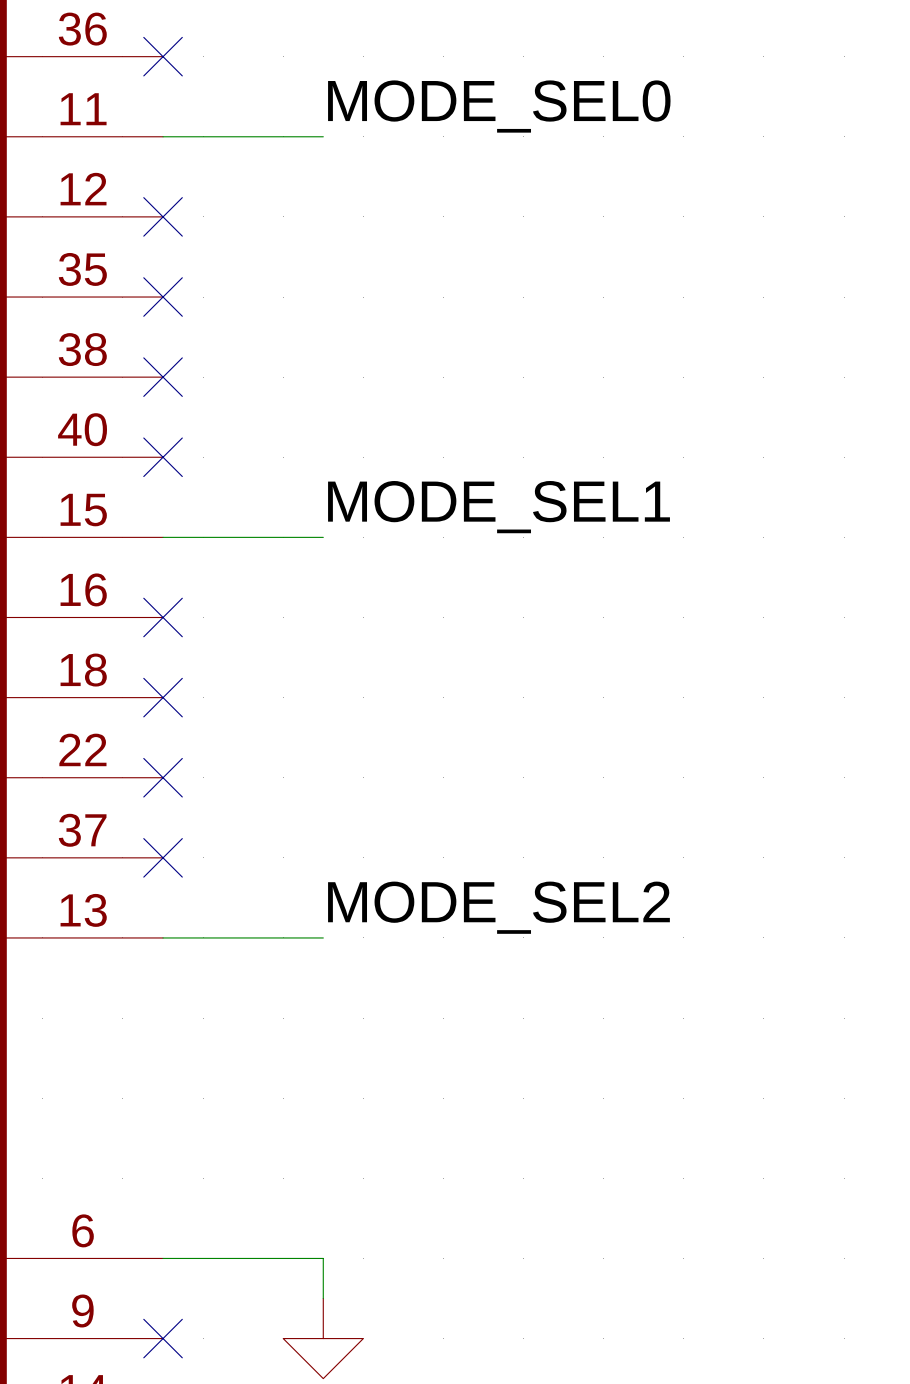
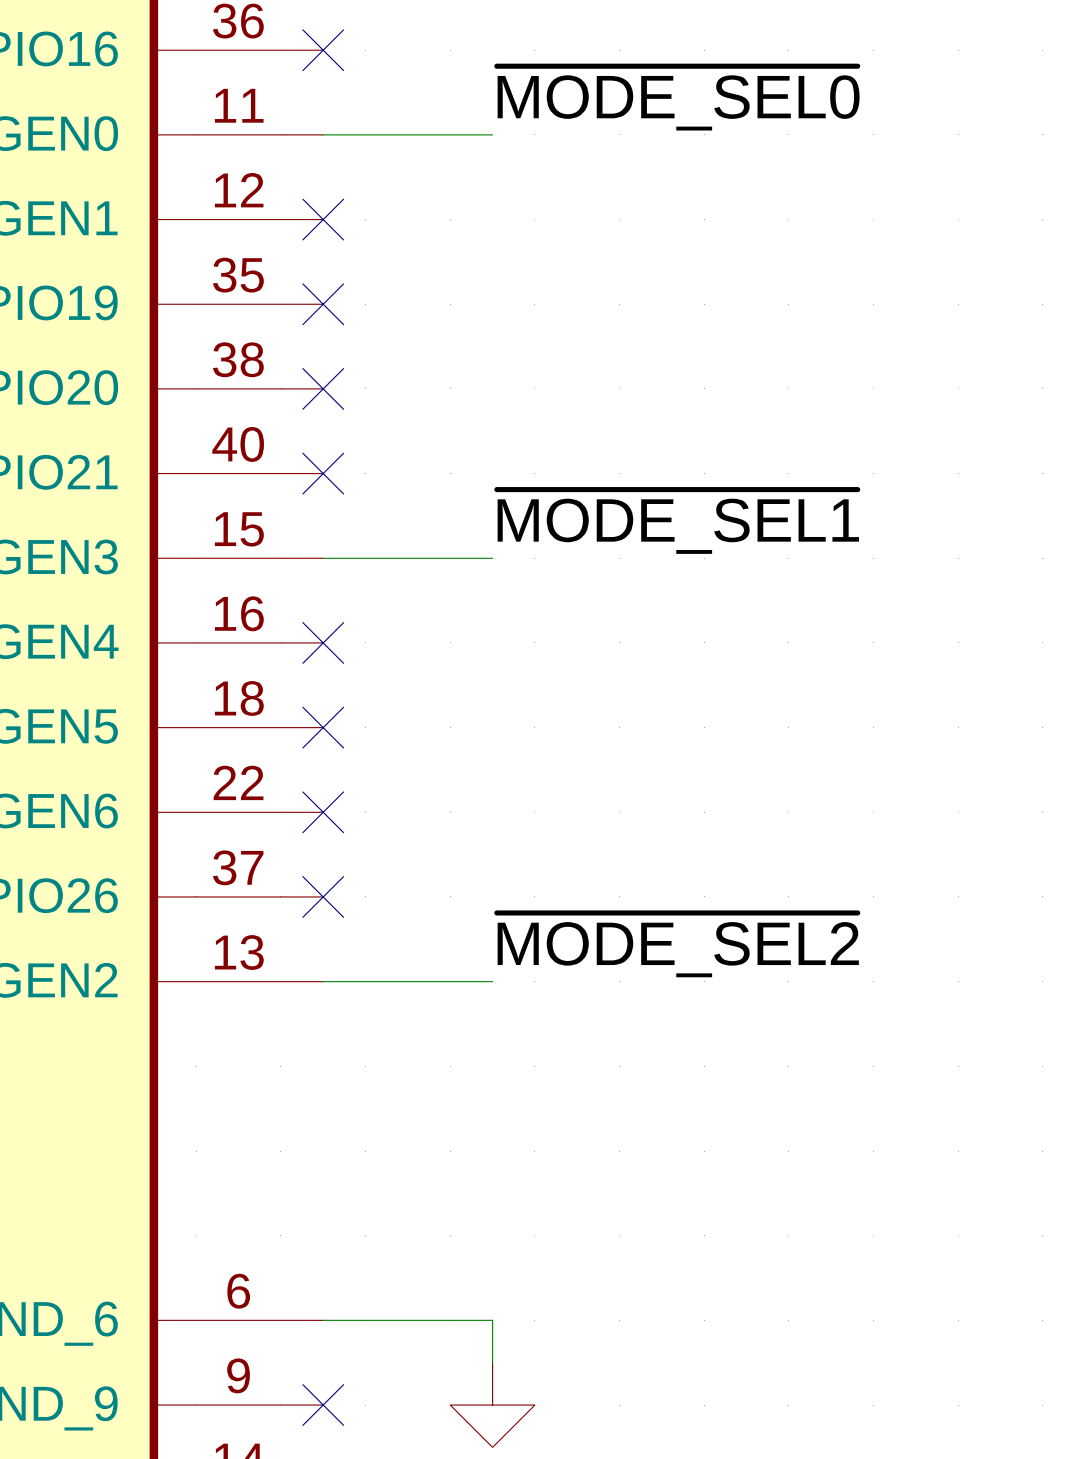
label: MODE_SEL0 (499, 106) -> ~{MODE_SEL0} (678, 98)
label: MODE_SEL1 (499, 507) -> ~{MODE_SEL1} (677, 521)
label: MODE_SEL2 (498, 907) -> ~{MODE_SEL2} (677, 945)

